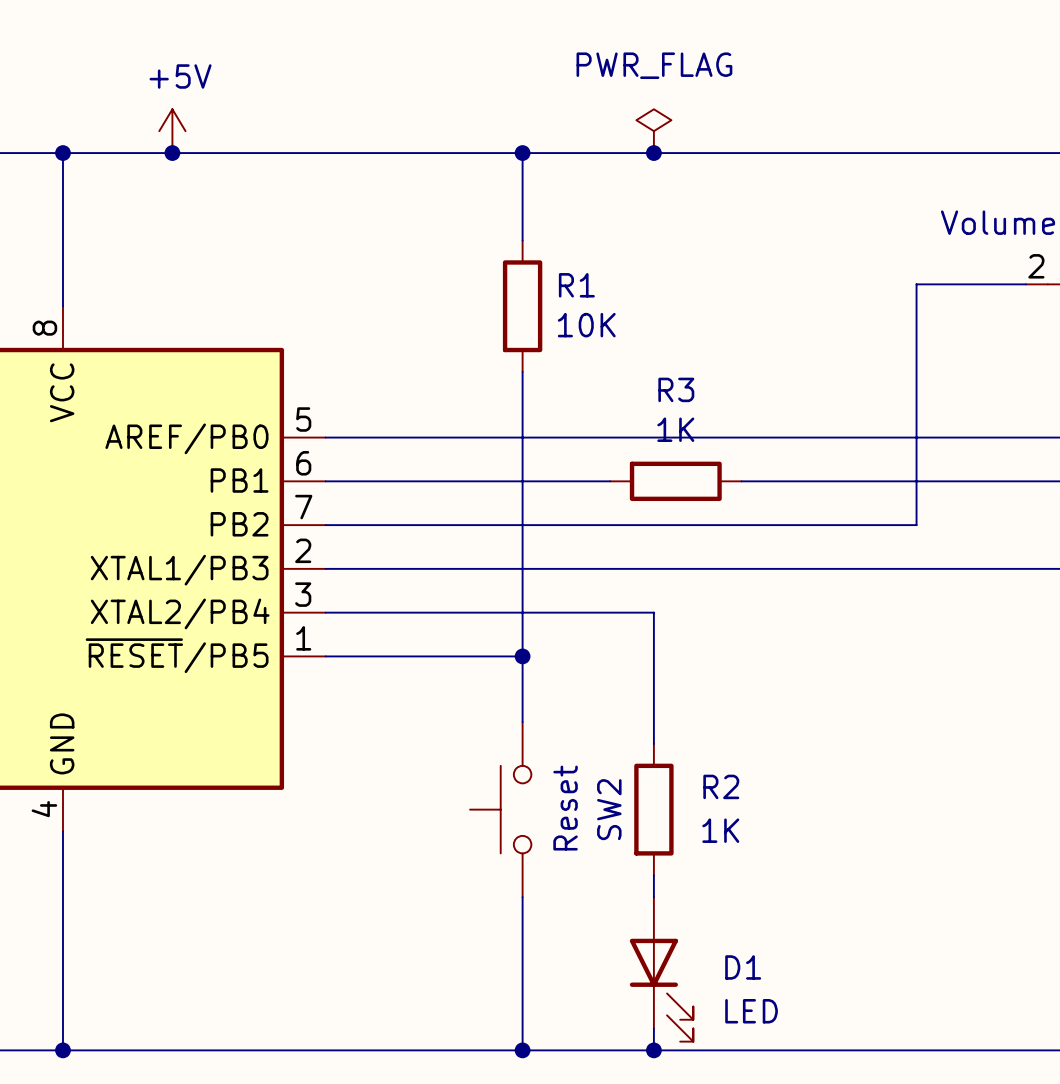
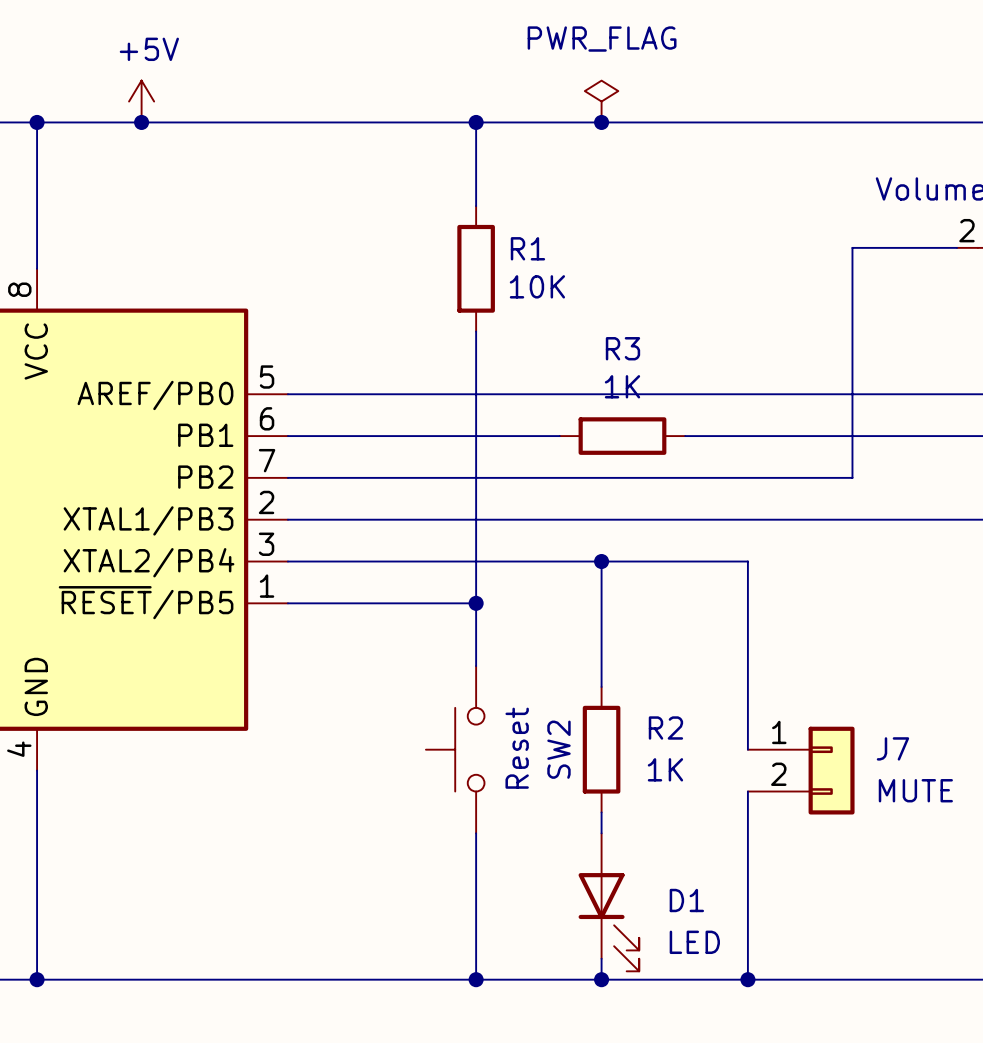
wire: none -> (601, 561) (747, 561) (747, 749)
junction: none -> (601, 561)
J7: none -> MUTE (801, 770)
wire: none -> (747, 791) (747, 979)
junction: none -> (747, 979)

